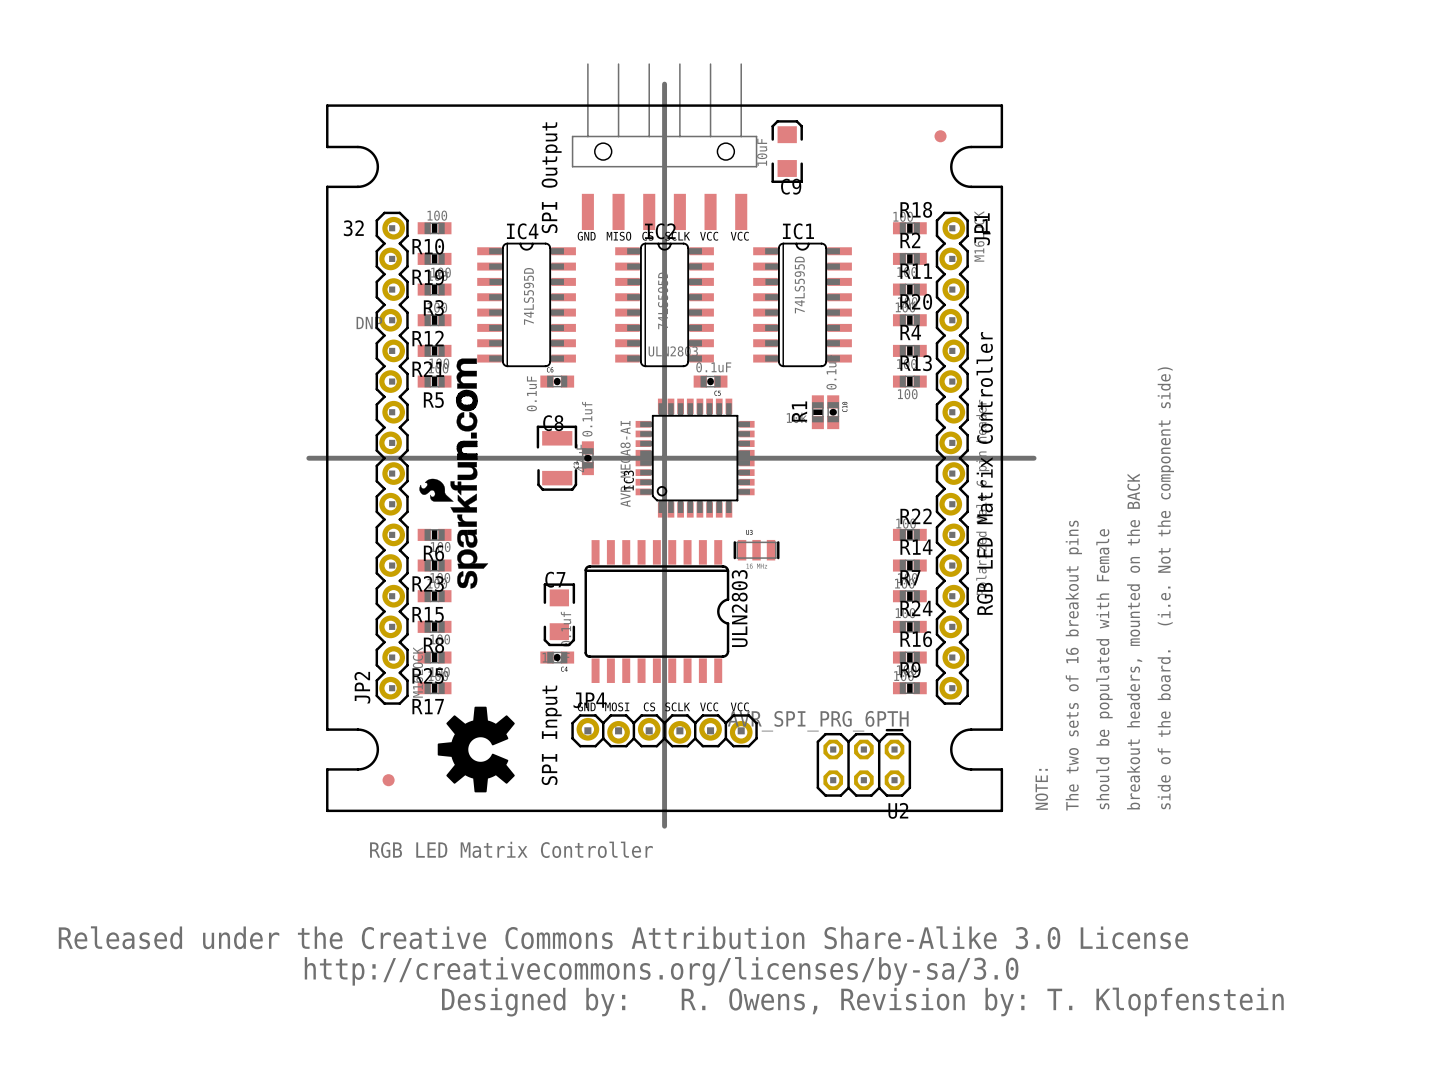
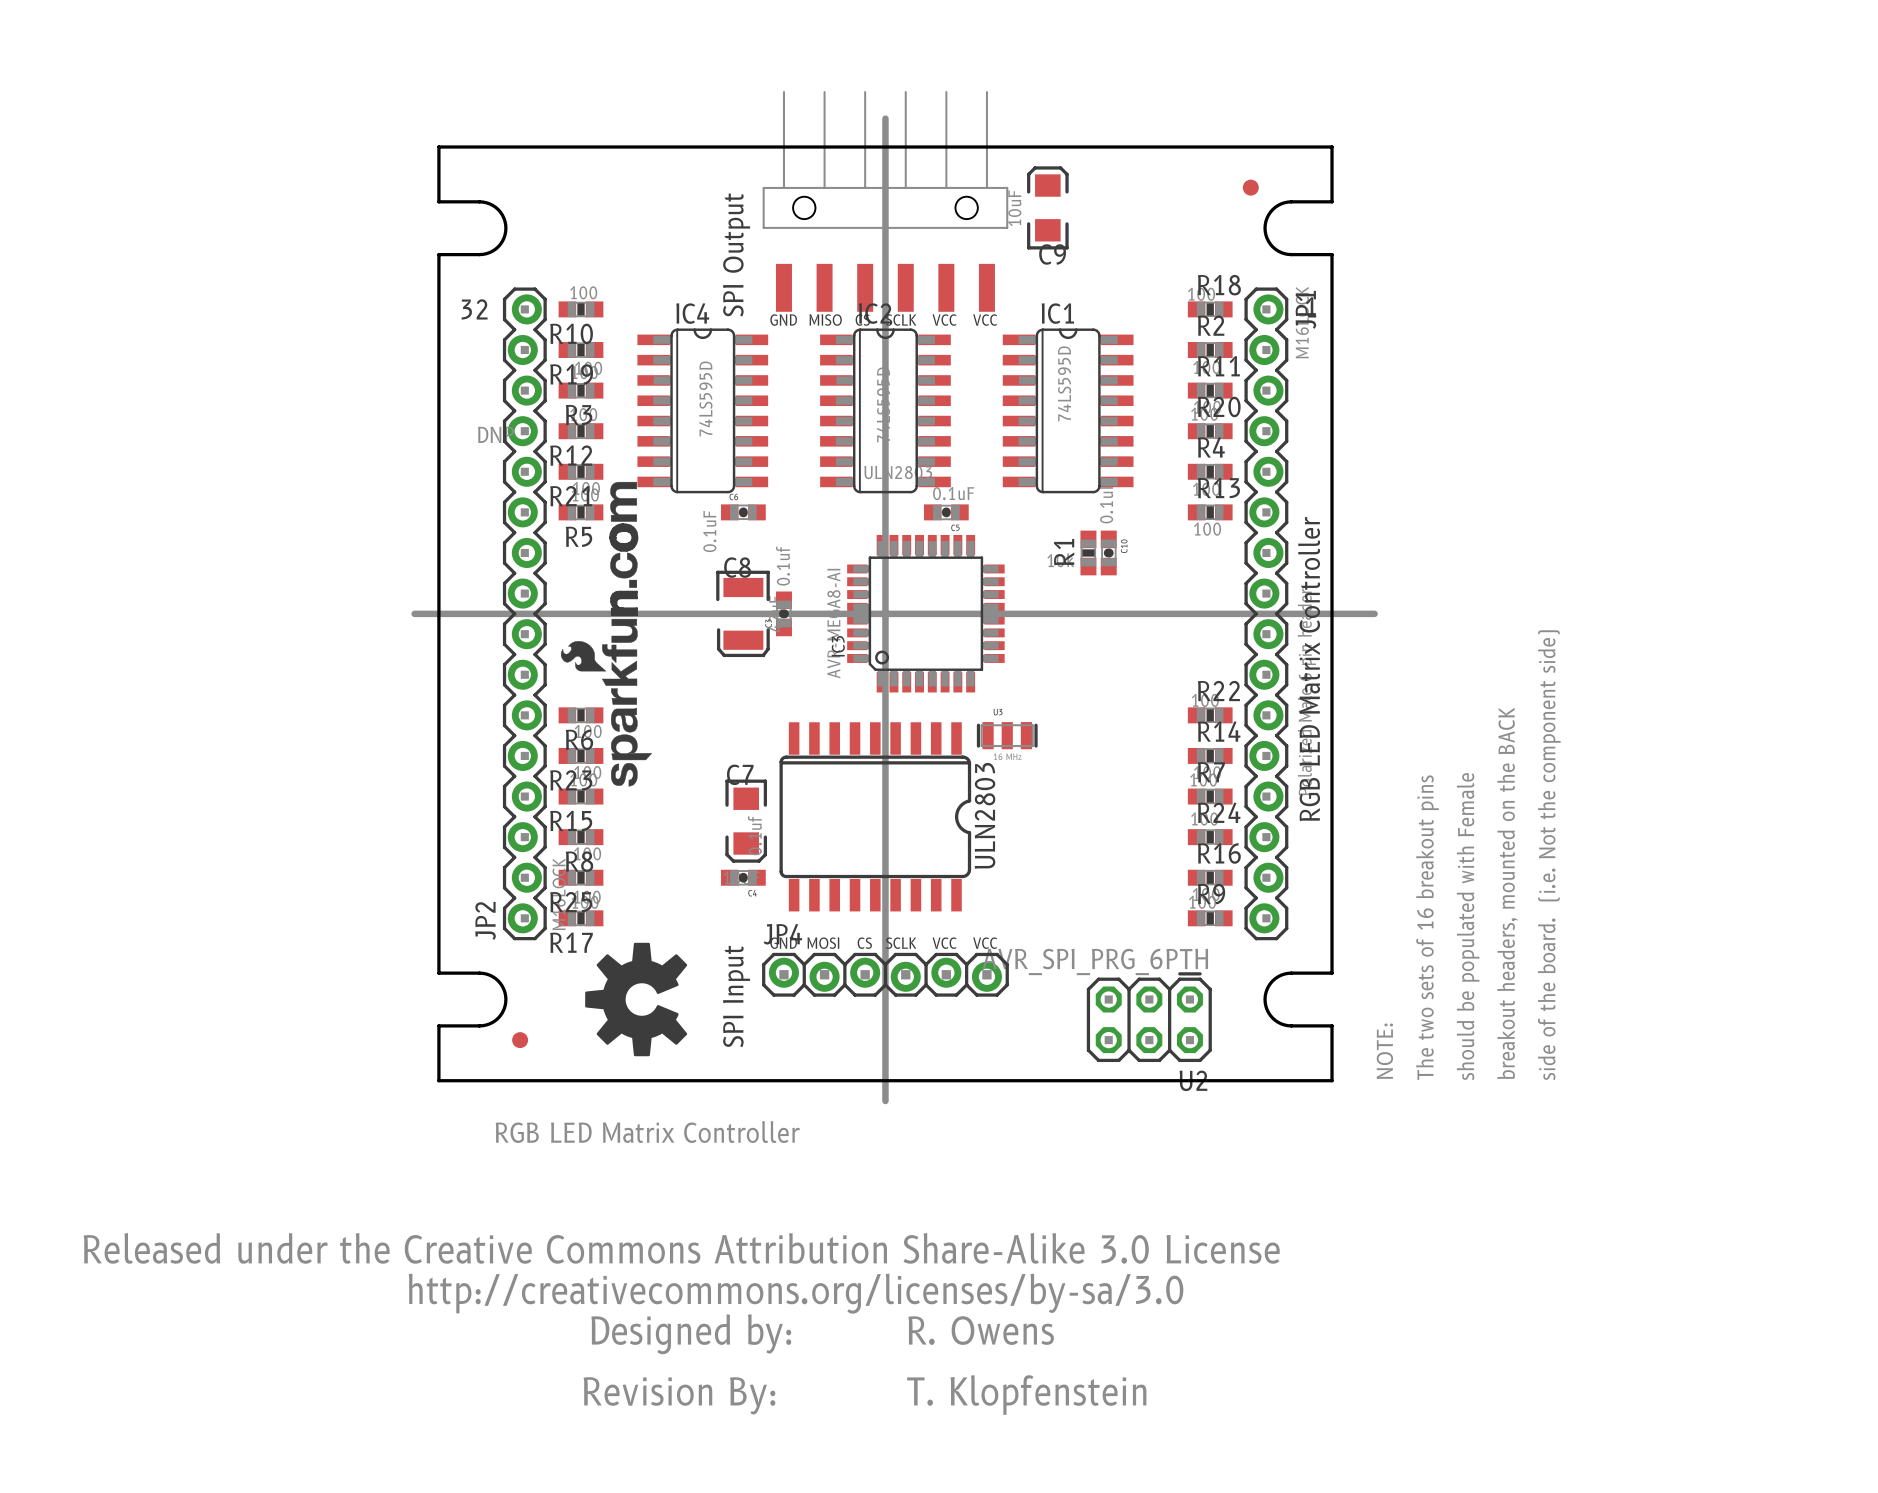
text: R. Owens, Revision by: T. Klopfenstein (982, 1001) -> R. Owens (981, 1330)
drawing: none -> [583, 1377, 776, 1415]
text: none -> T. Klopfenstein (1026, 1395)

